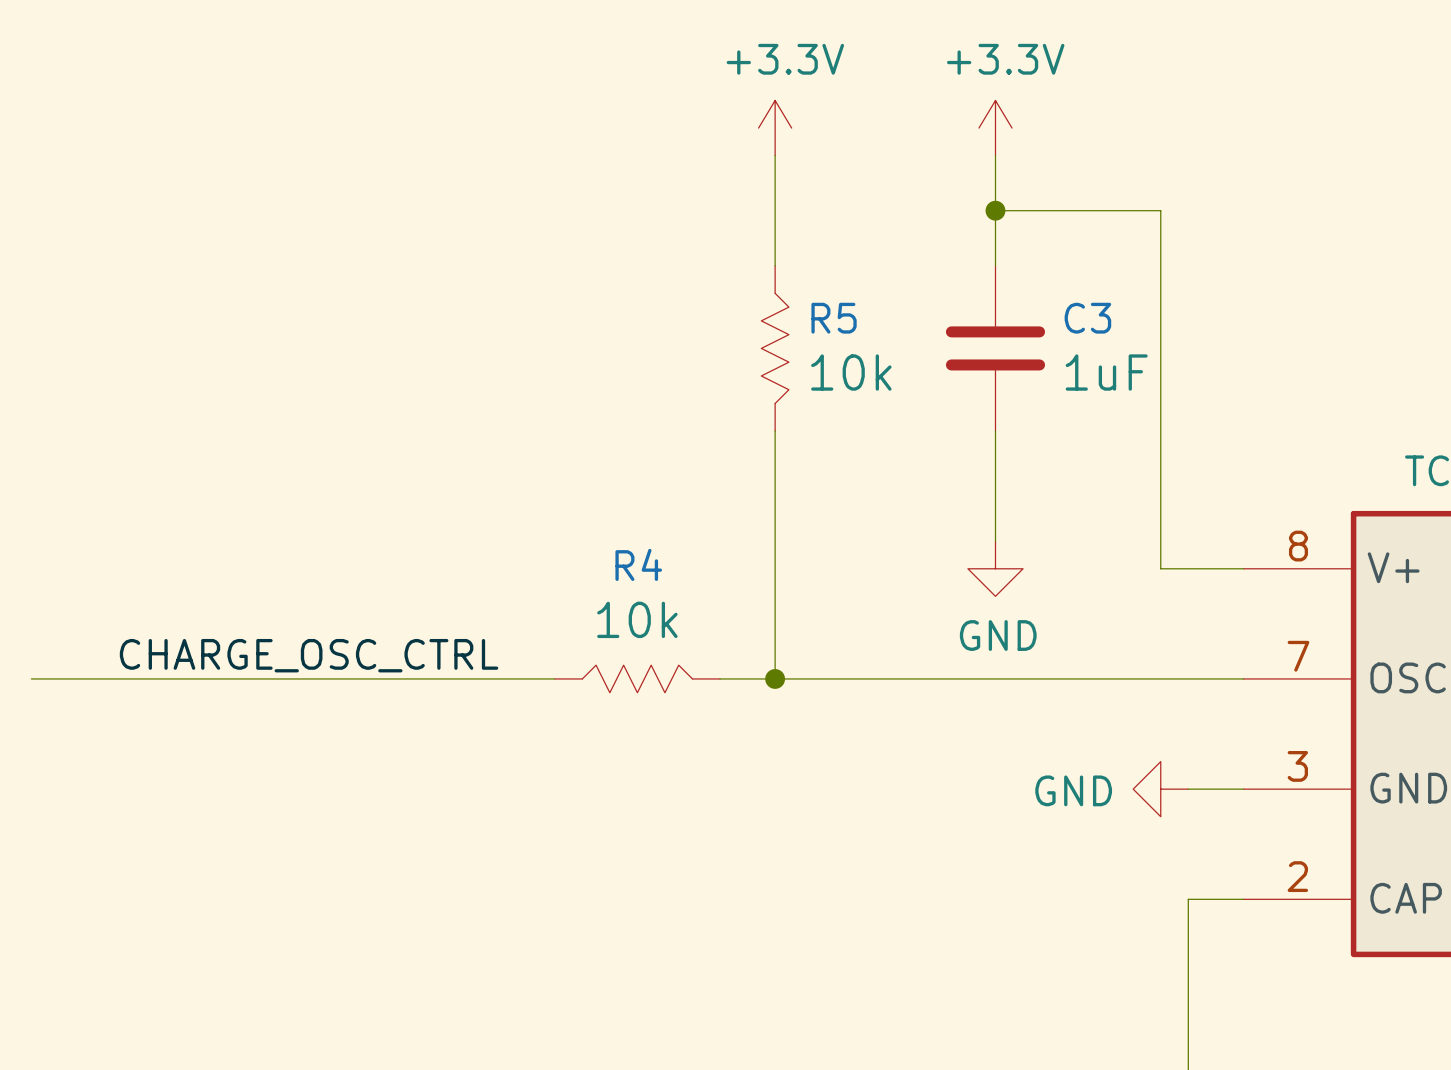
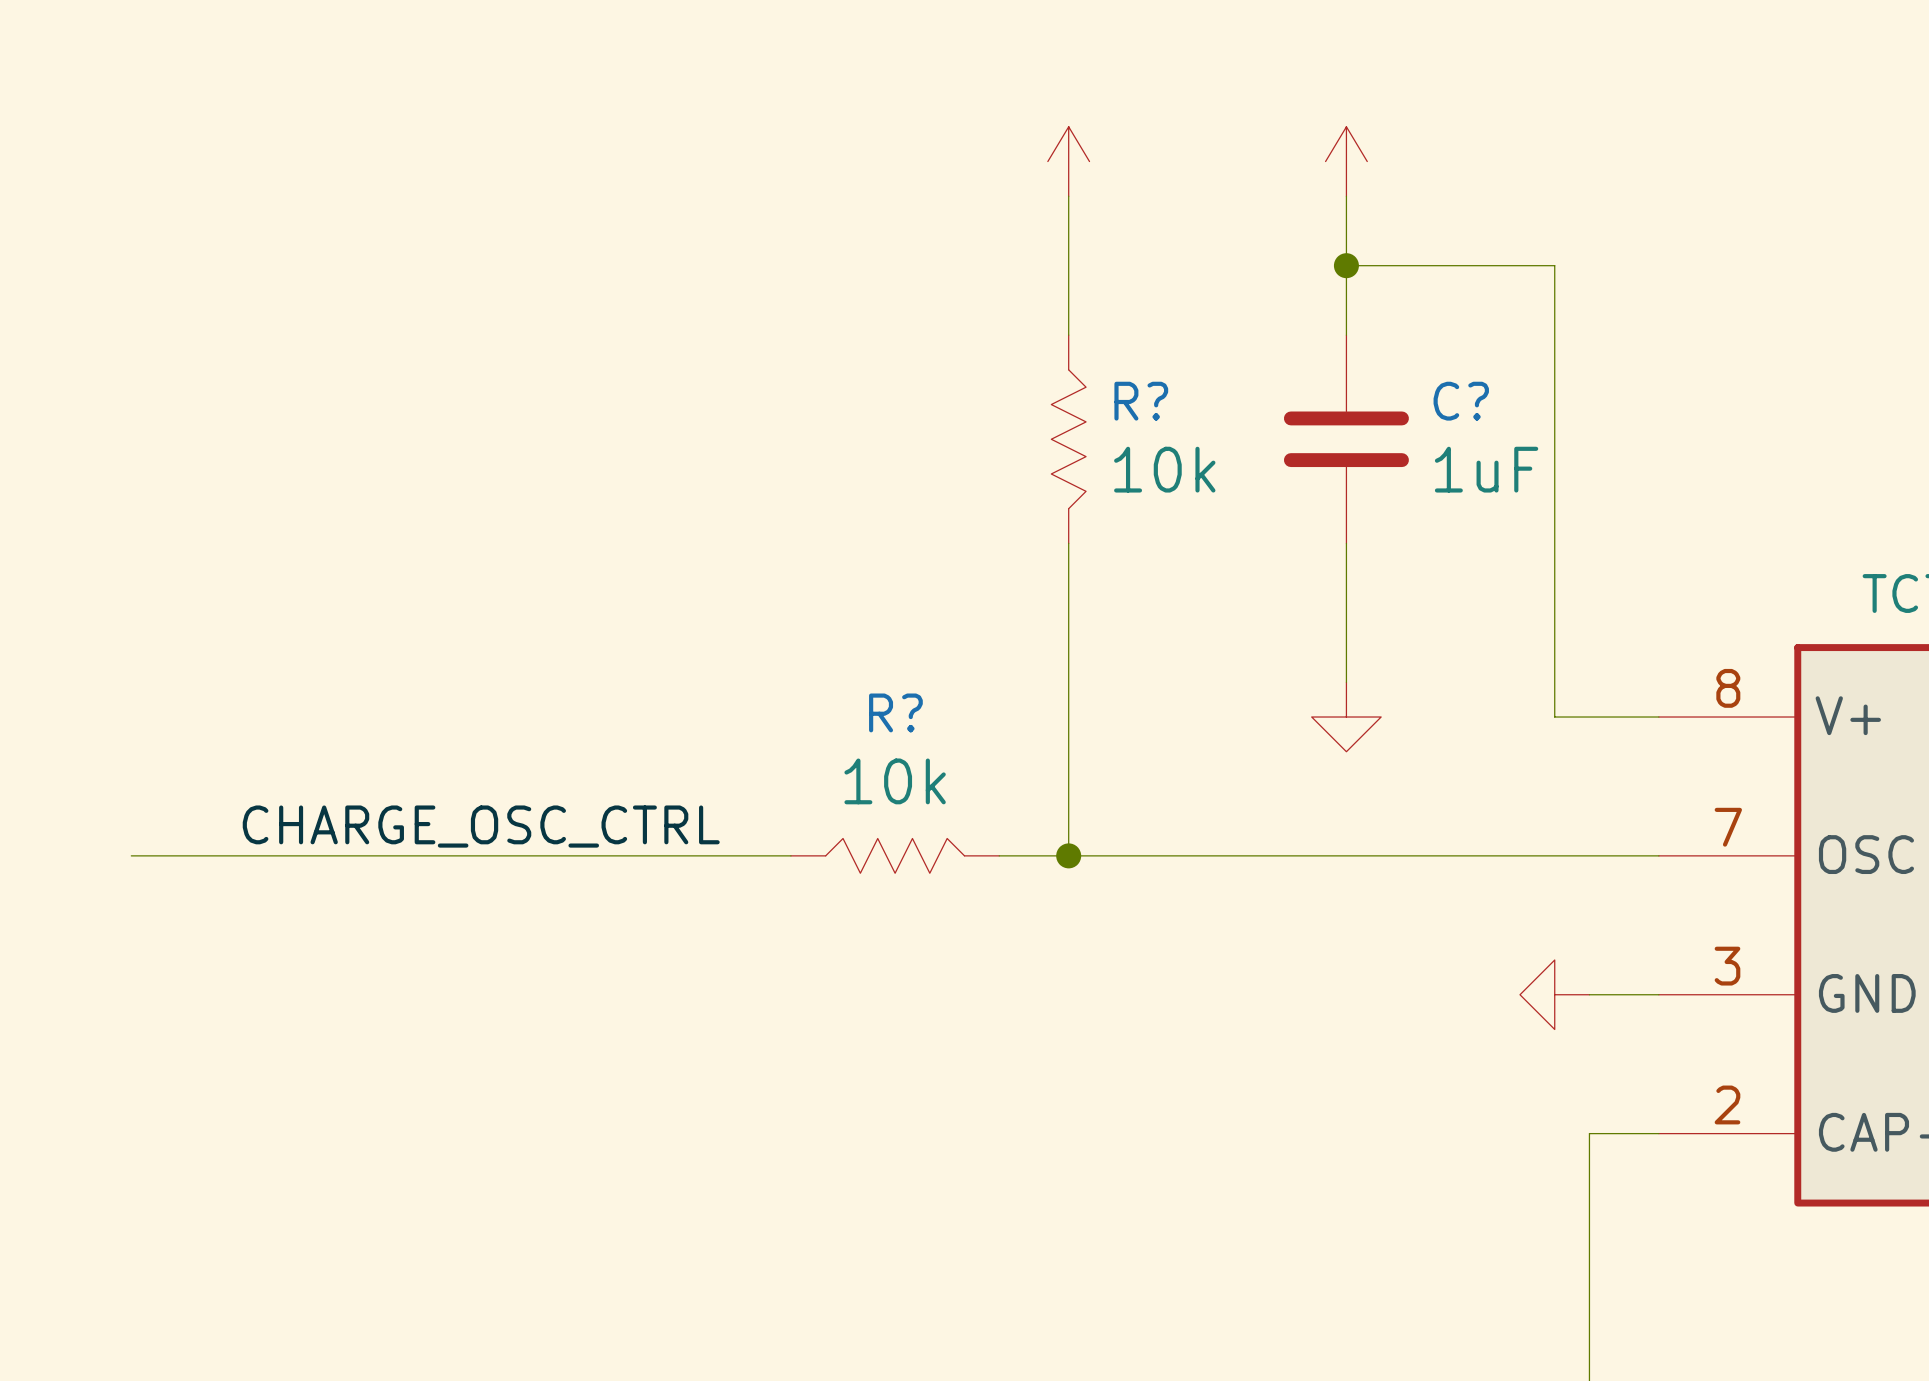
power symbol text: +3.3V (785, 59) -> none
power symbol text: +3.3V (1005, 59) -> none
R5 name: R5 (834, 318) -> R? (1141, 401)
C3 name: C3 (1087, 318) -> C? (1461, 401)
R4 name: R4 (638, 564) -> R? (895, 712)
power symbol text: GND (998, 635) -> none
power symbol text: GND (1073, 790) -> none

